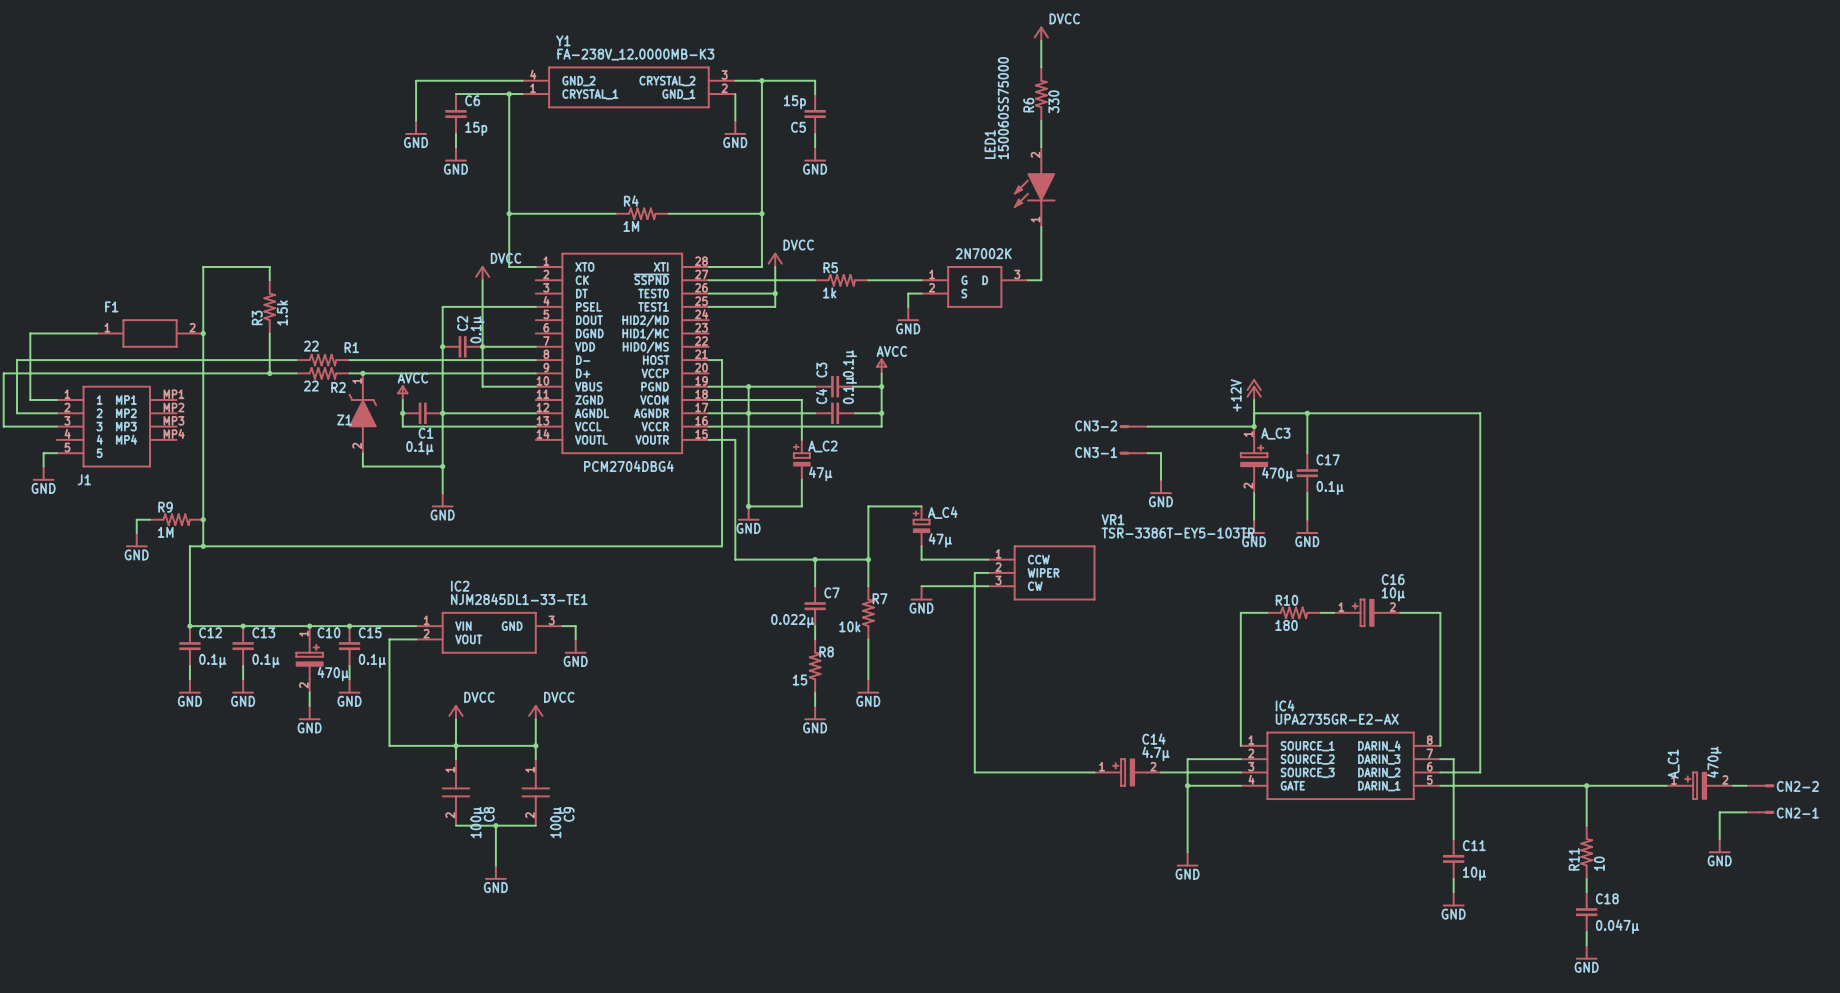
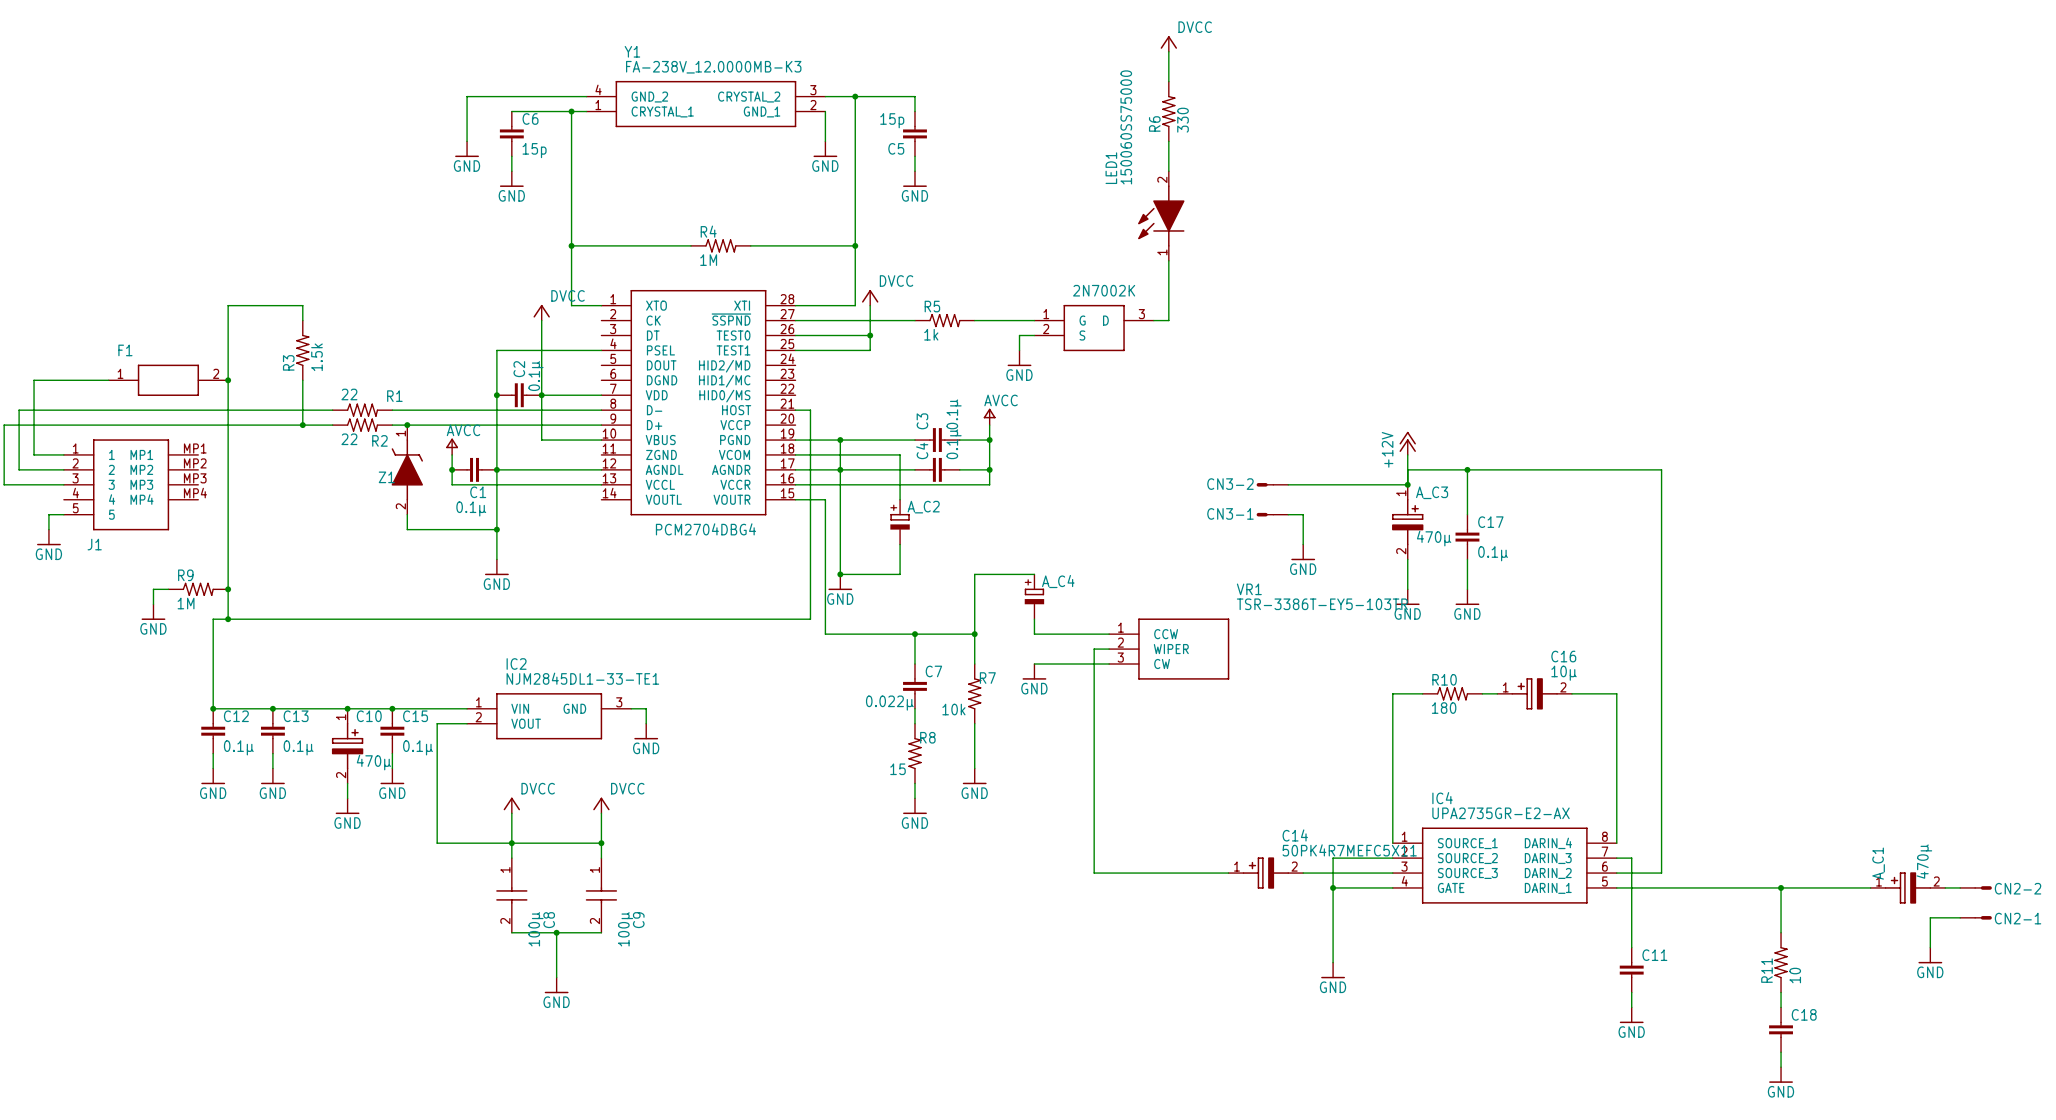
A_C2 value: 47μ (820, 473) -> none
A_C4 value: 47μ (940, 540) -> none
C14 value: 4.7μ (1155, 753) -> 50PK4R7MEFC5X11 (1349, 850)
C11 value: 10μ (1474, 873) -> none
C18 value: 0.047μ (1617, 926) -> none

